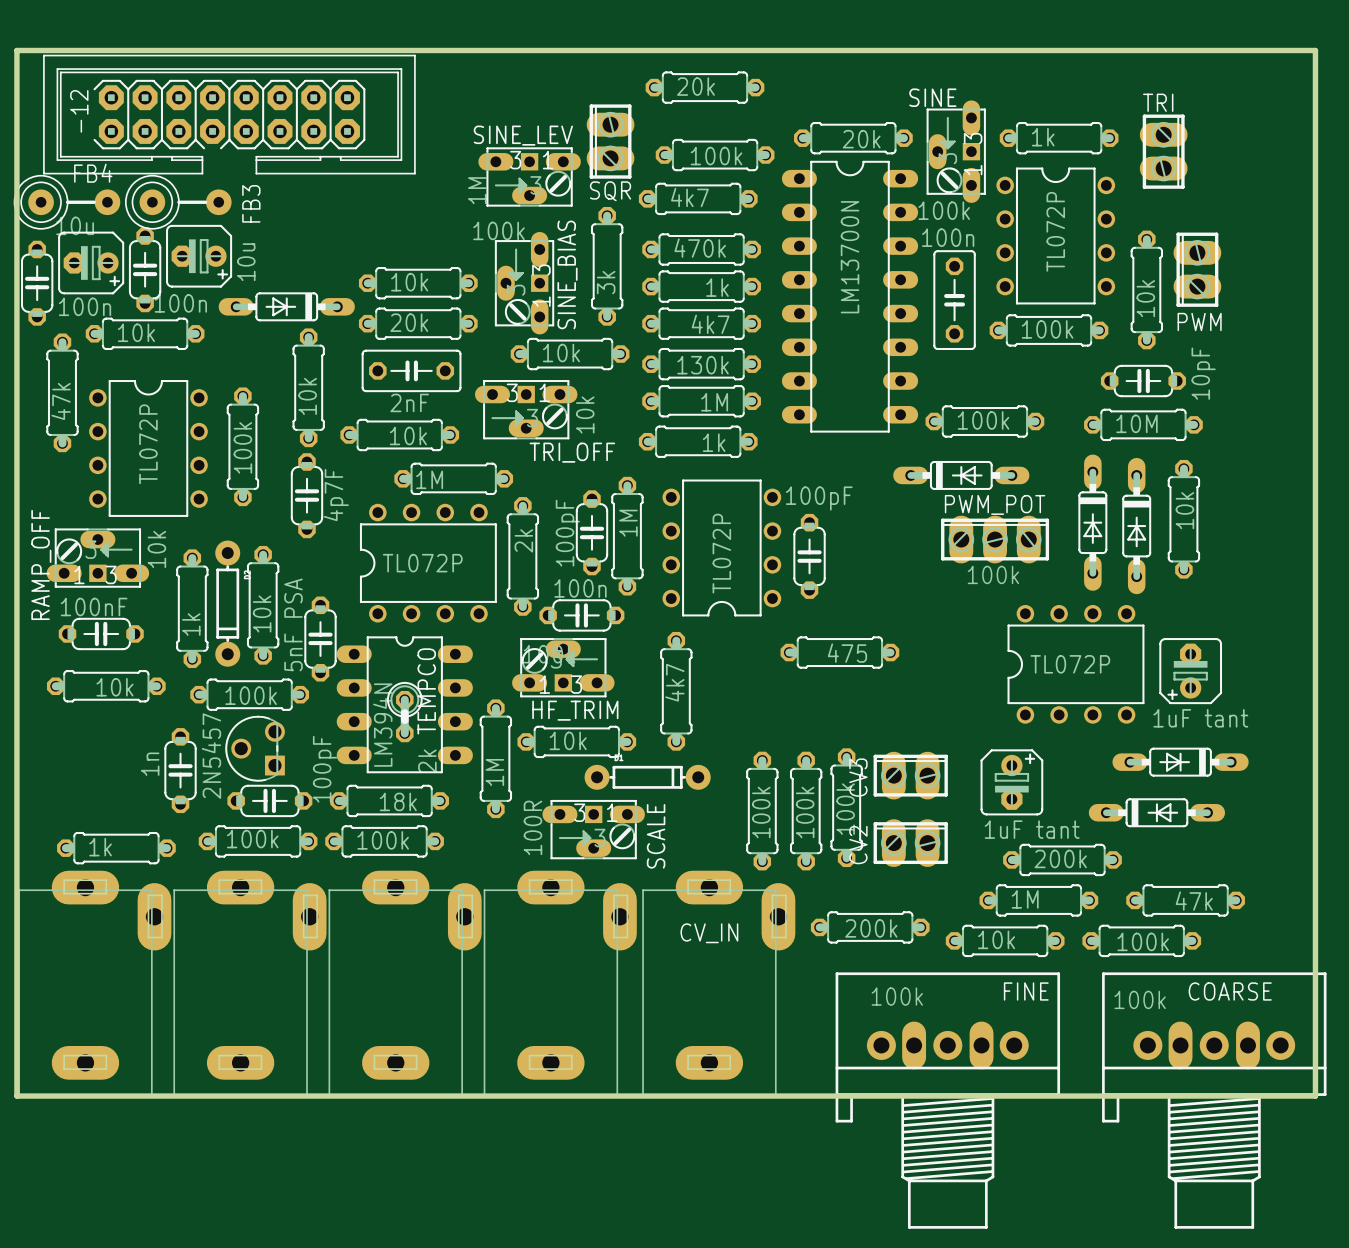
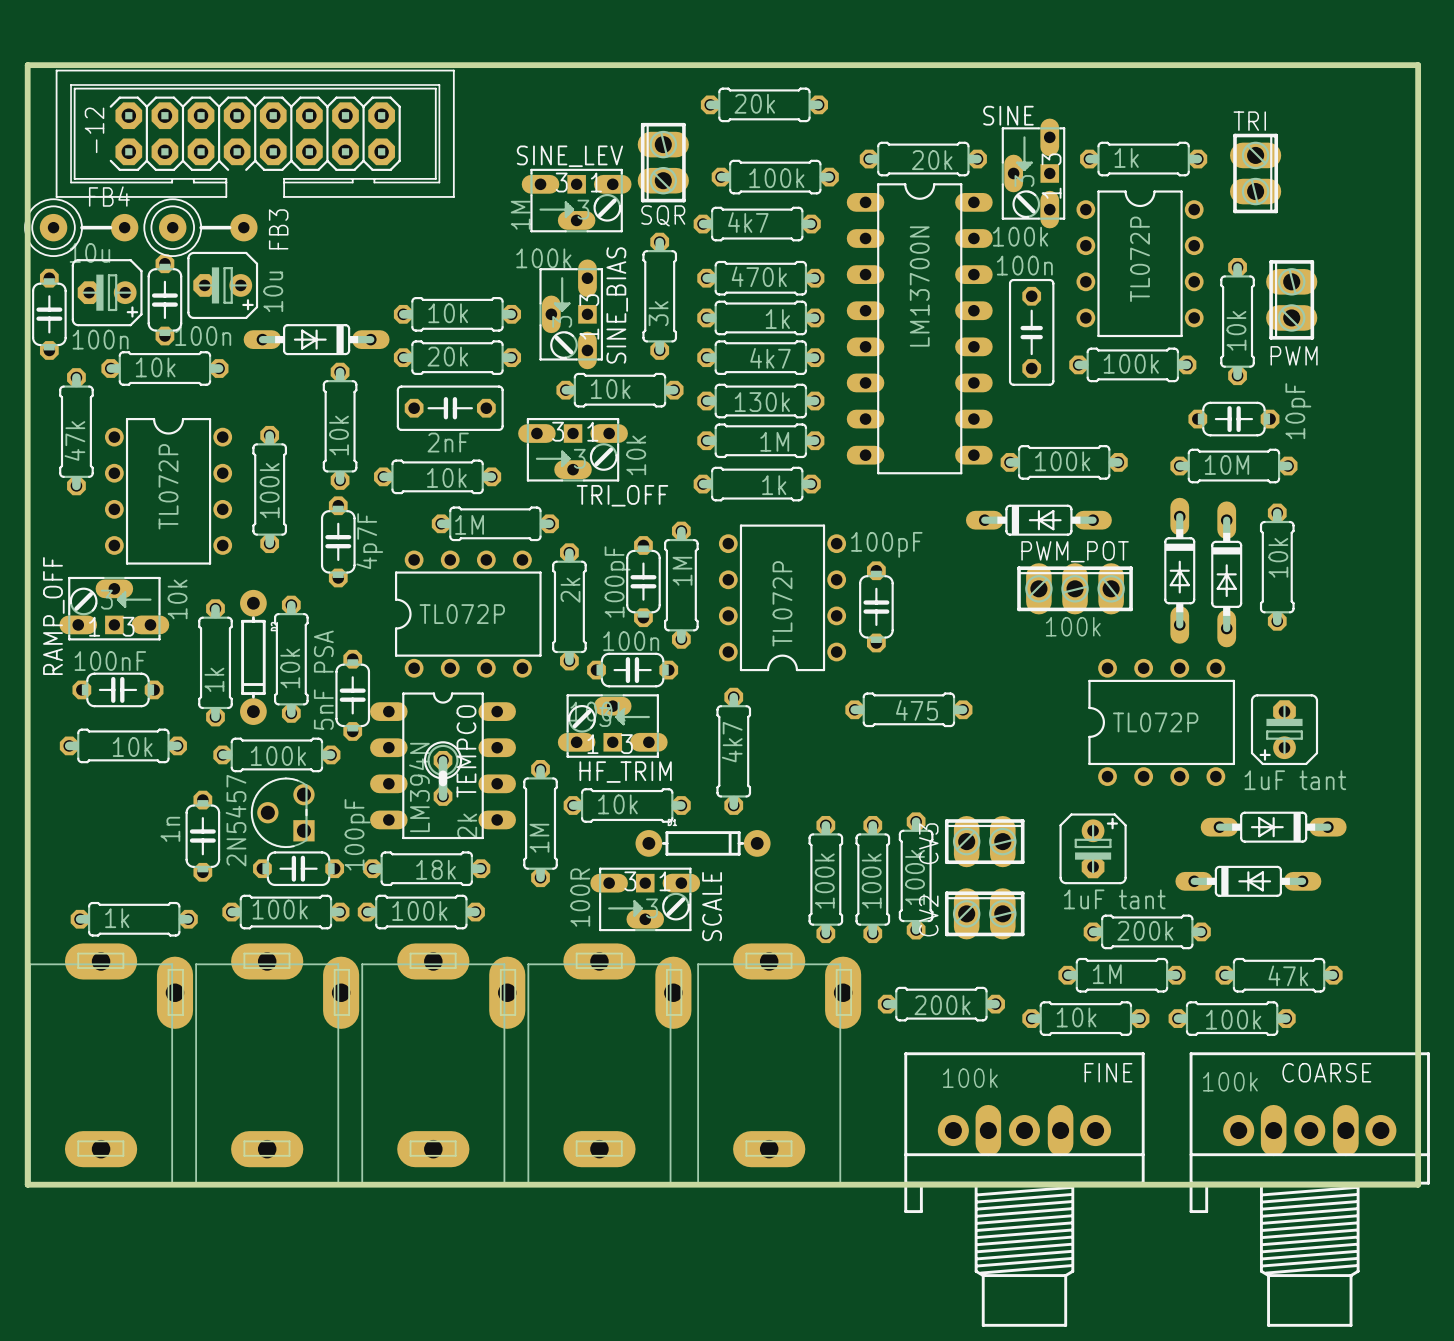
CV_IN name: CV_IN (709, 933) -> none

